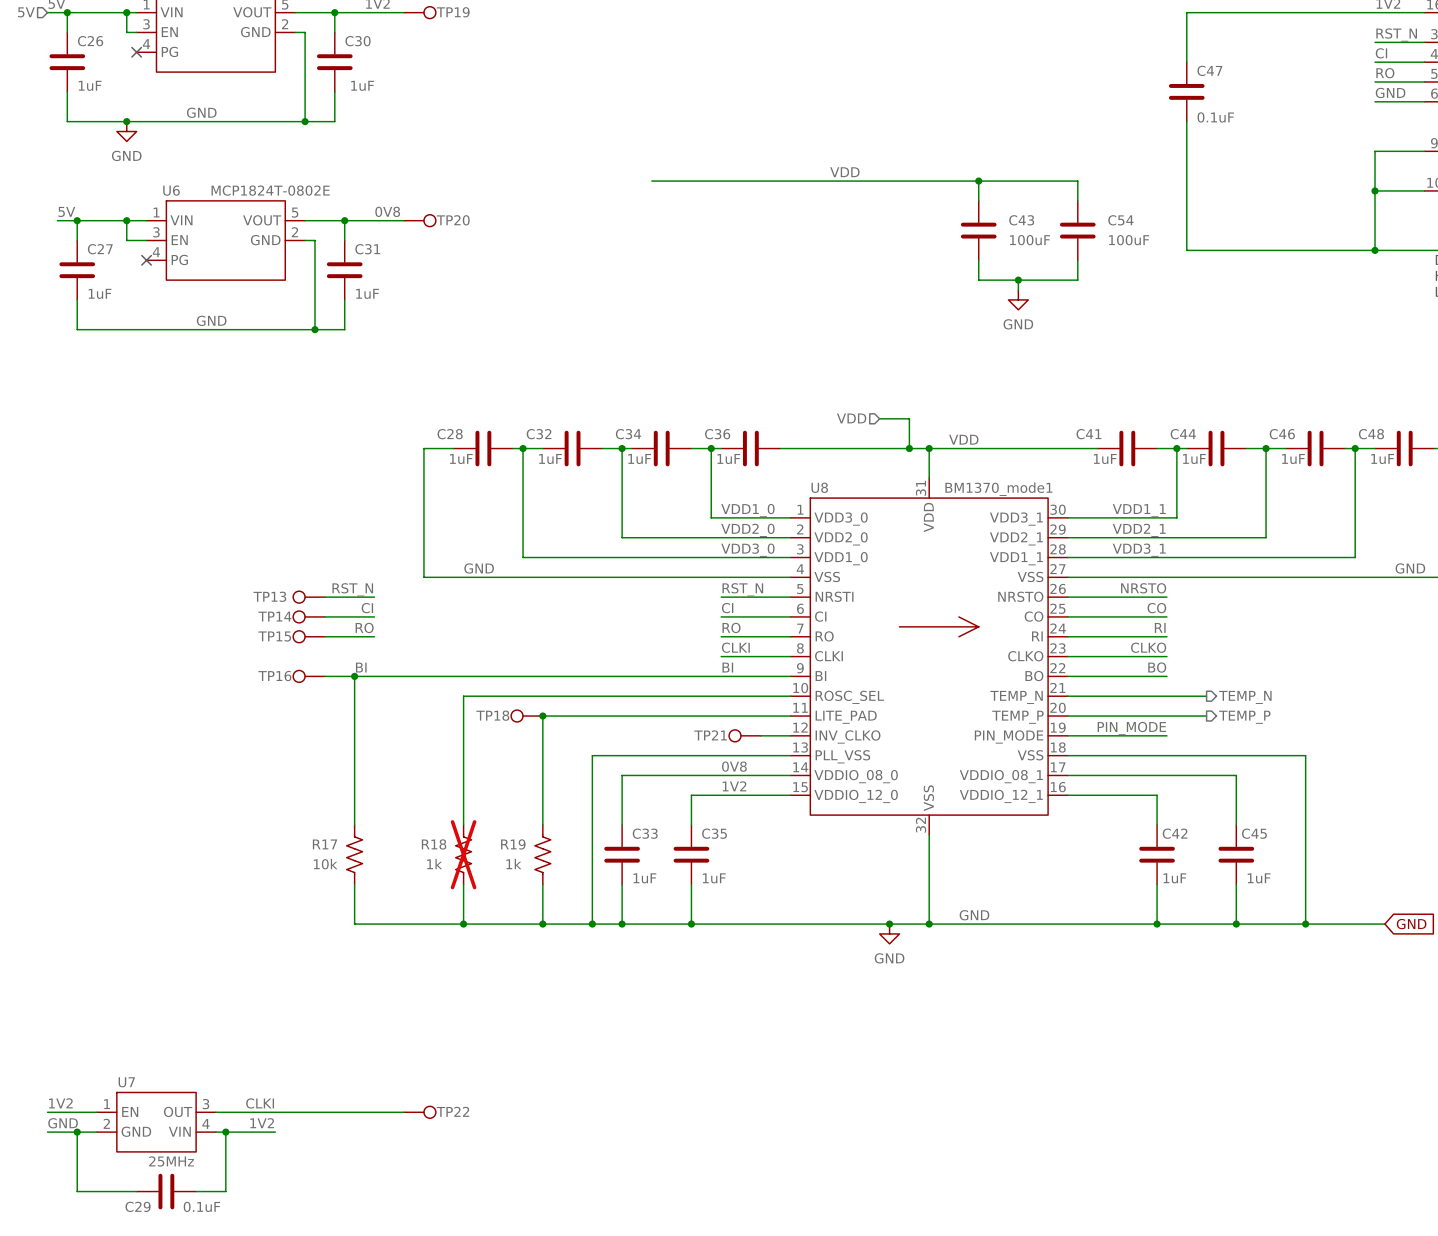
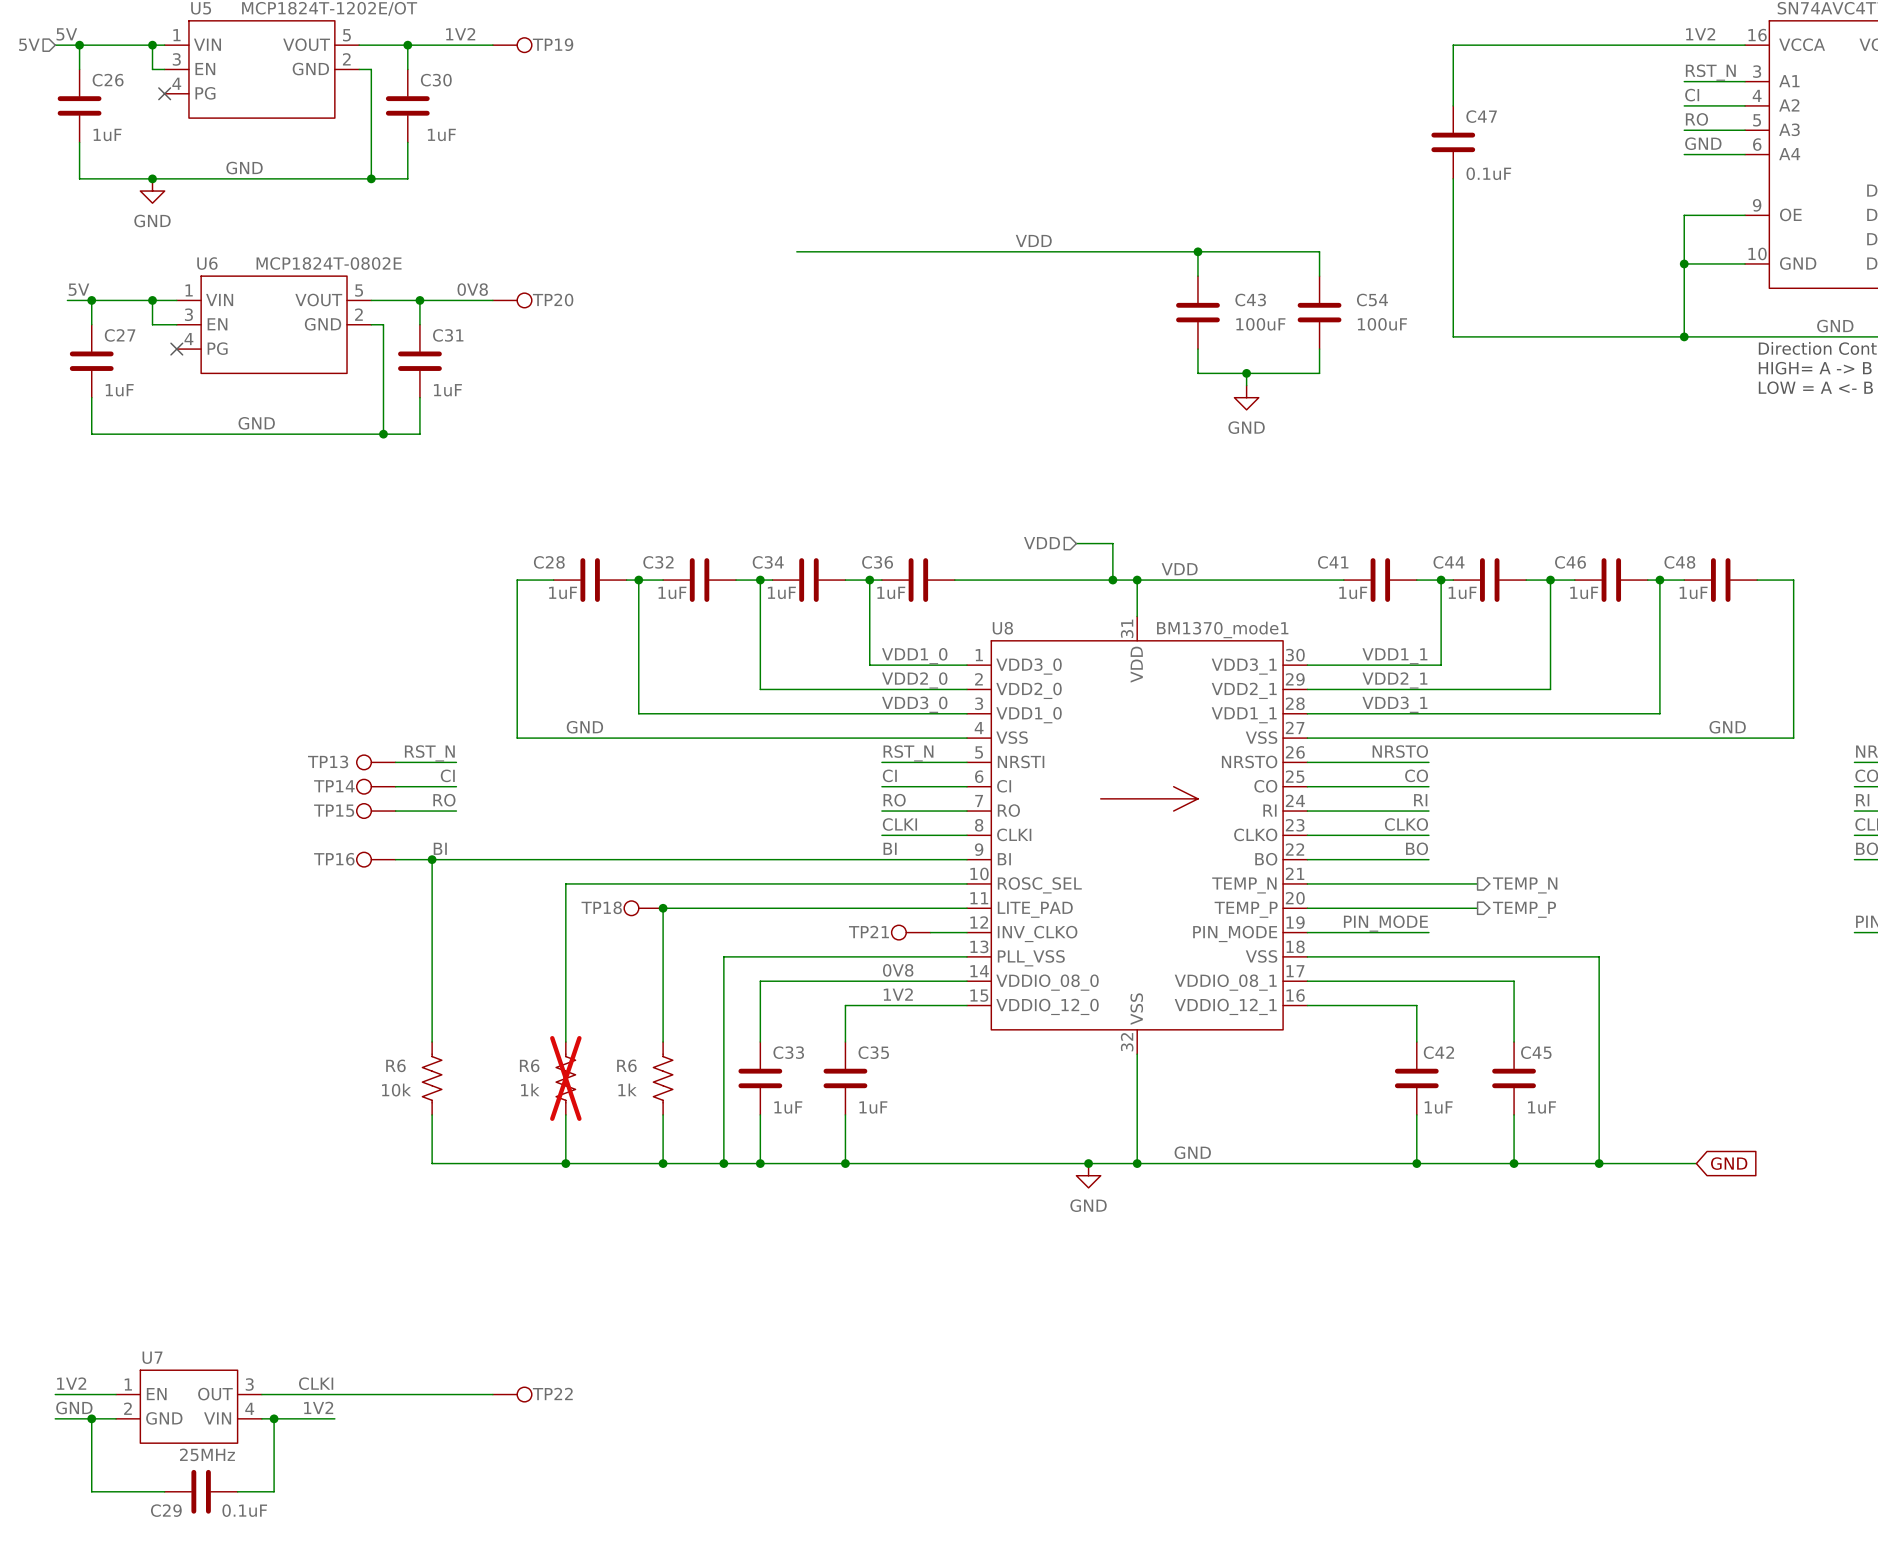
R17 name: R17 (324, 844) -> R6 (395, 1065)
R18 name: R18 (434, 844) -> R6 (529, 1065)
R19 name: R19 (513, 844) -> R6 (626, 1065)

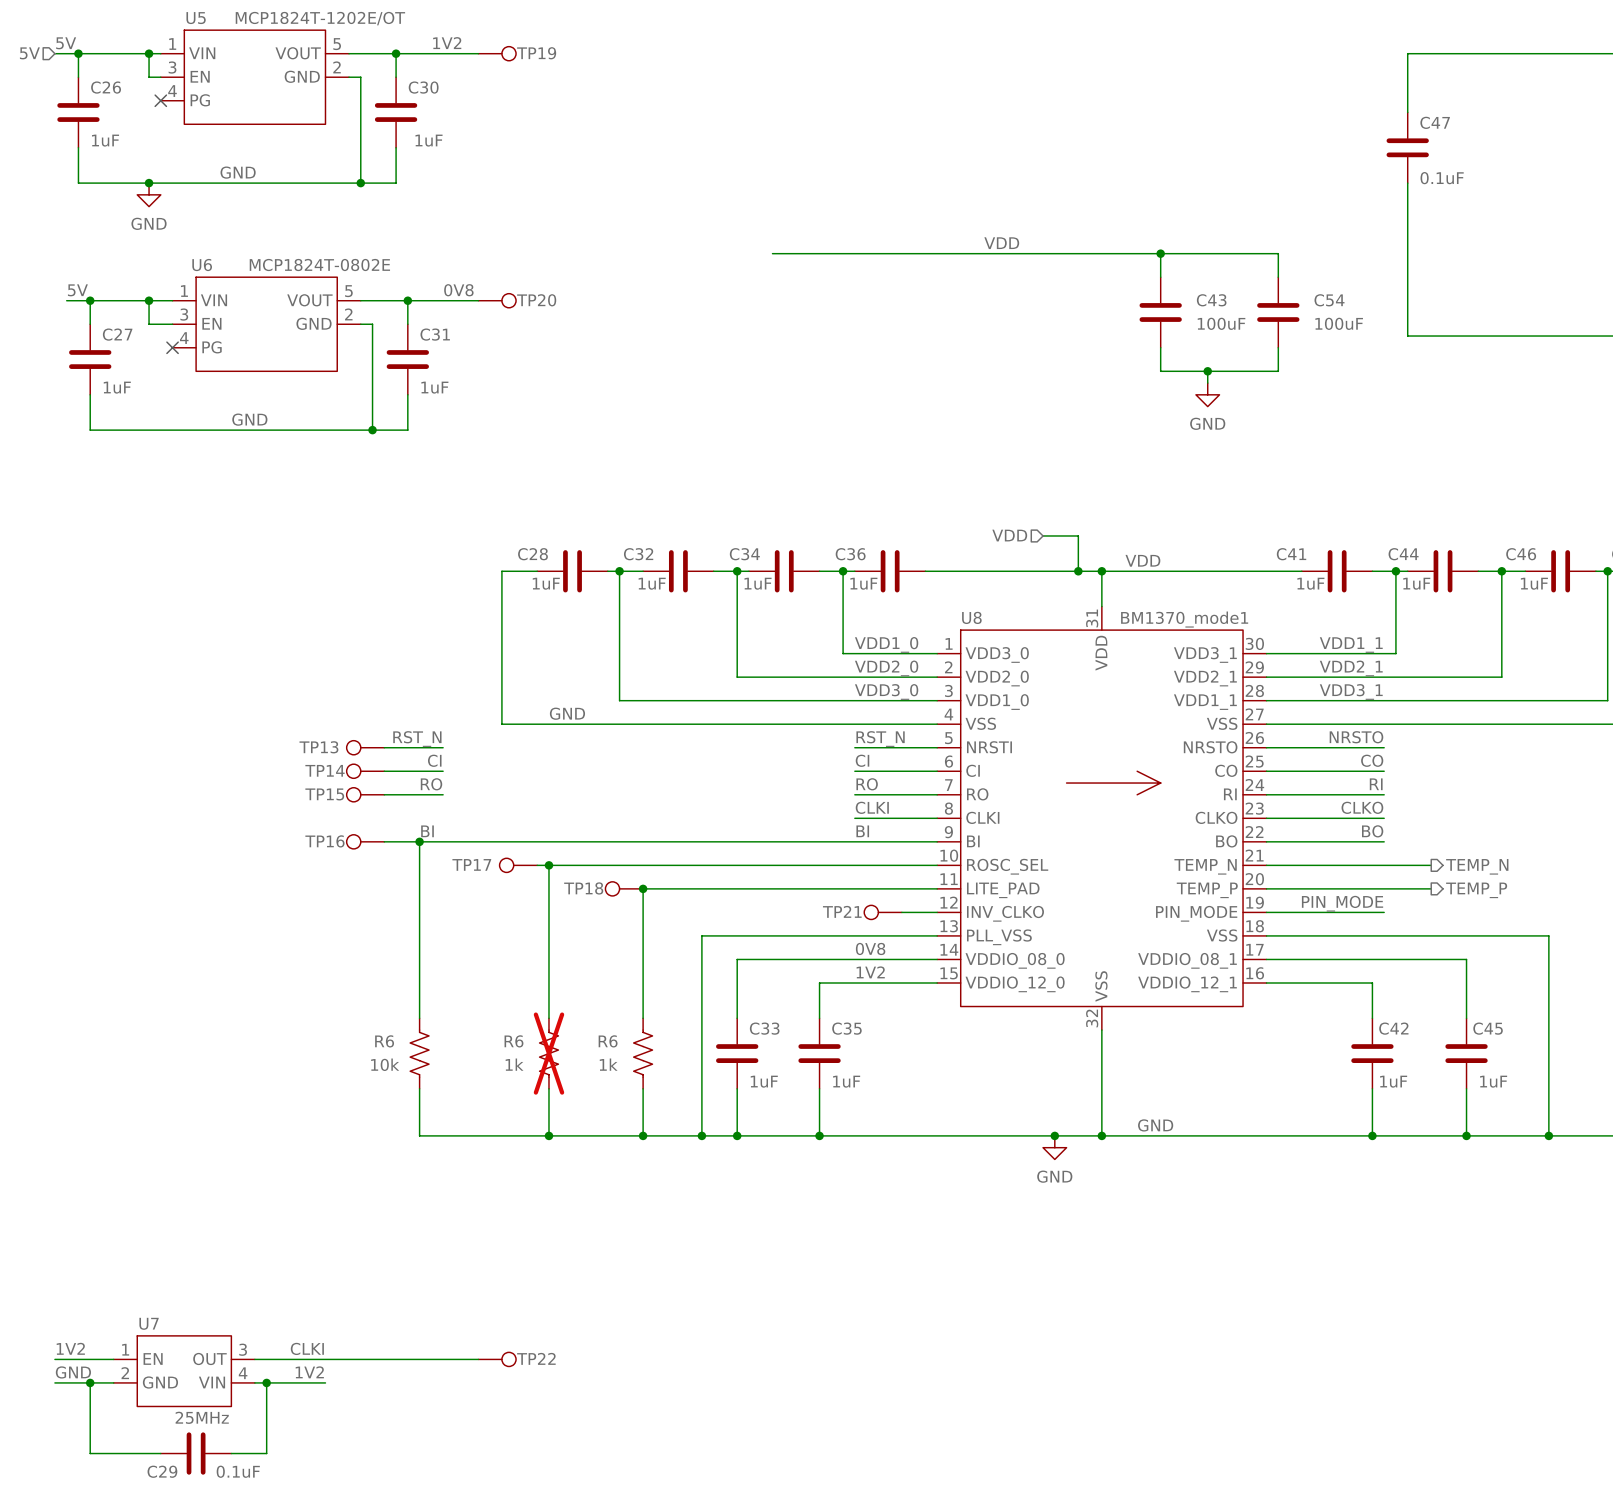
TP17: none -> (518, 865)
wire: none -> (537, 865) (548, 865)
junction: none -> (548, 865)

